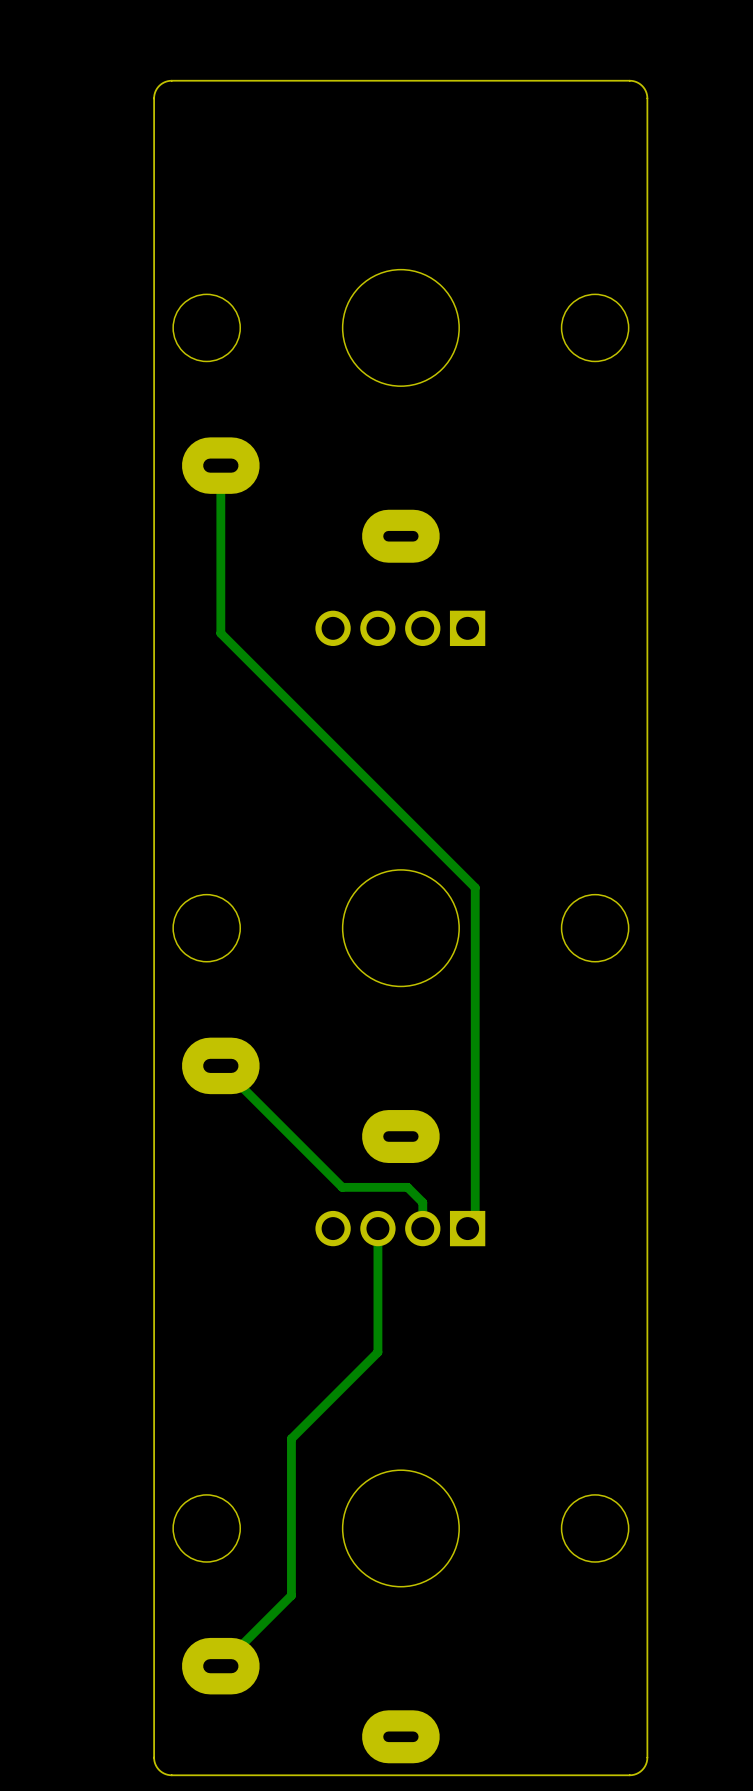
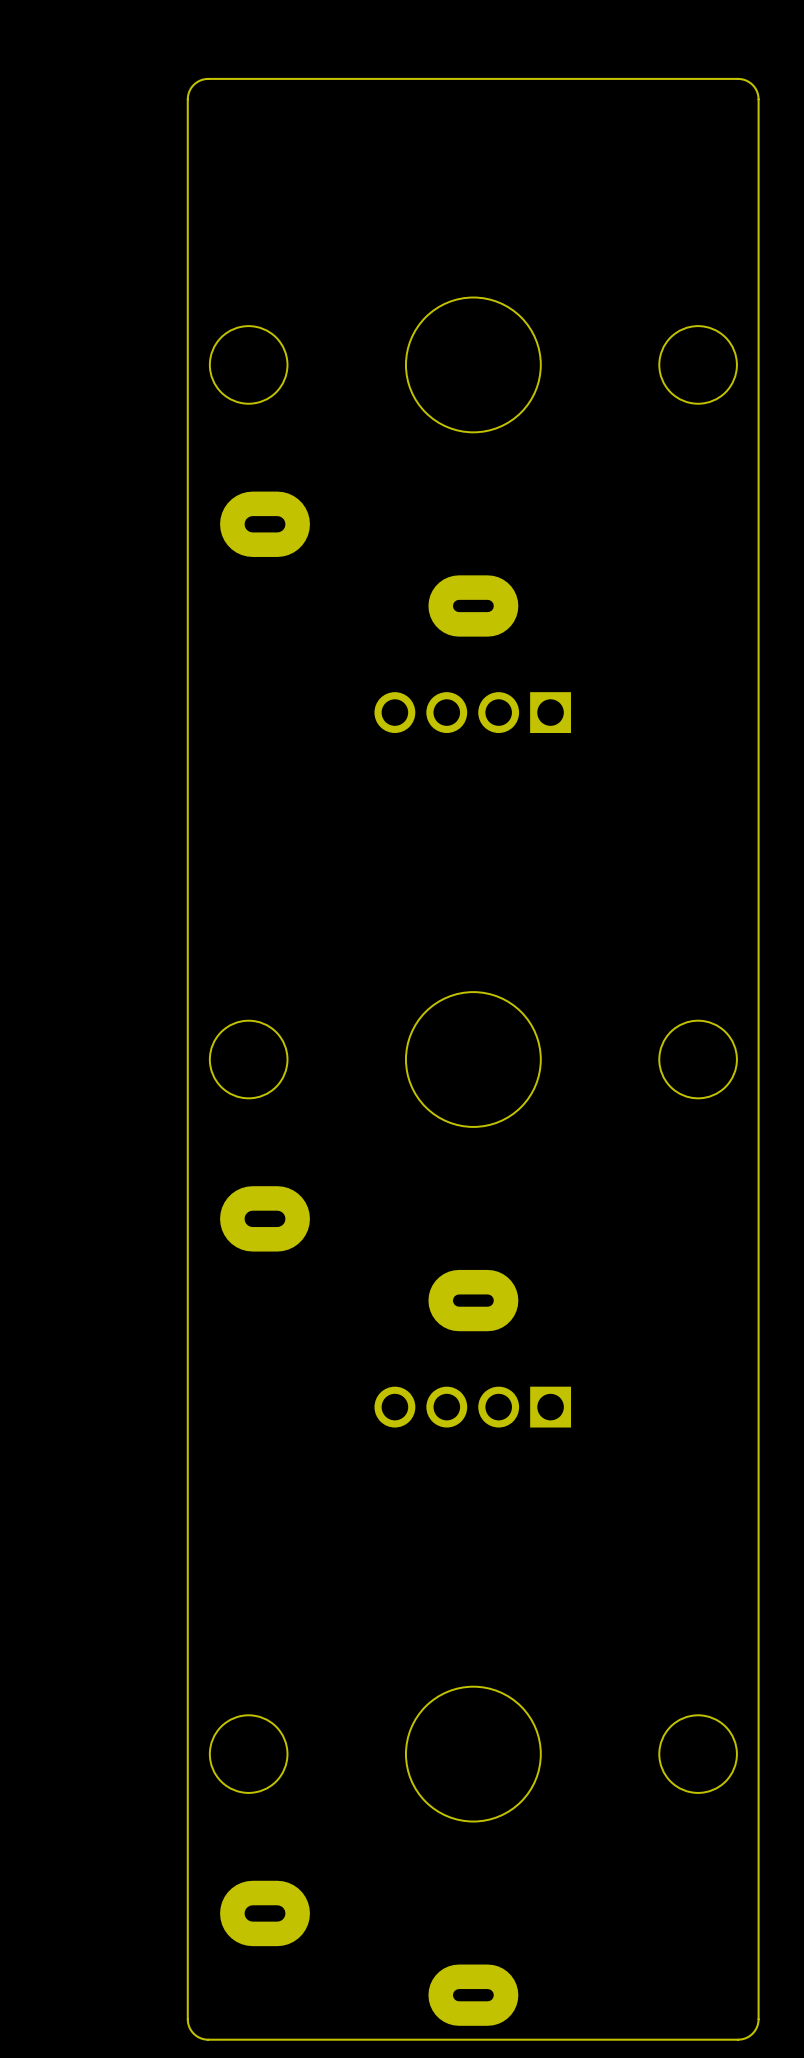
track: (220, 465) (220, 633) (475, 887) (475, 1220) (467, 1228) -> none
track: (220, 1065) (342, 1187) (407, 1187) (422, 1202) (422, 1228) -> none
track: (377, 1228) (377, 1352) (291, 1438) (291, 1595) (220, 1666) -> none

